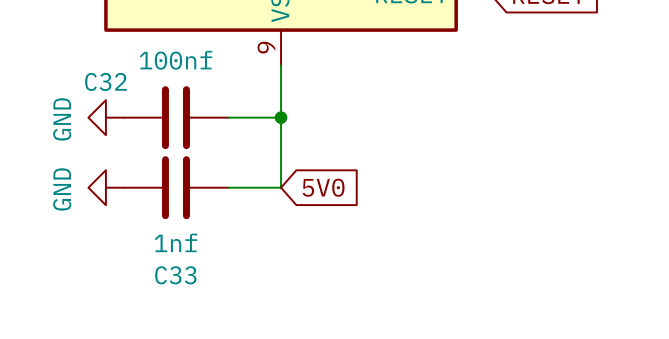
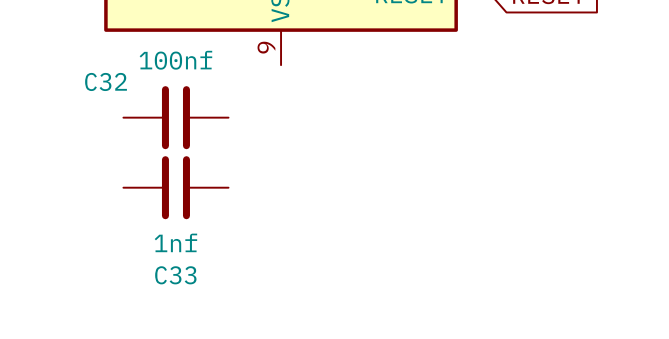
wire: (281, 65) (281, 187) (228, 187) -> none
power symbol: GND (105, 117) -> none
wire: (228, 117) (281, 117) -> none
junction: (281, 117) -> none
power symbol: GND (105, 187) -> none
global label: 5V0 (323, 187) -> none

